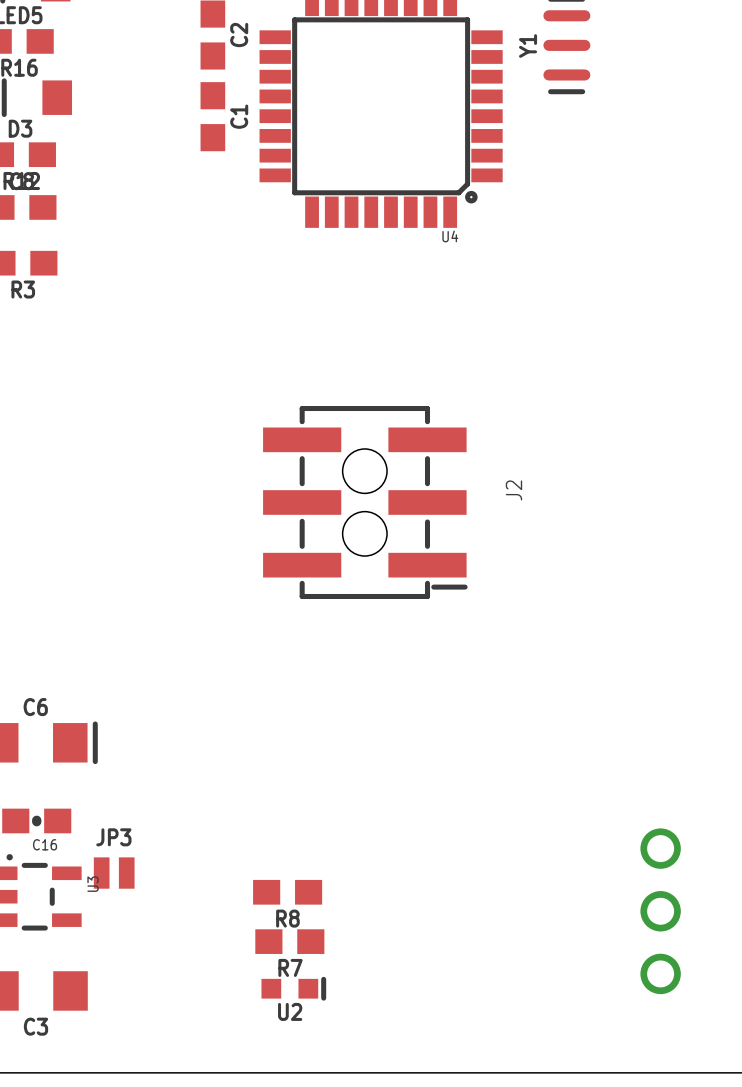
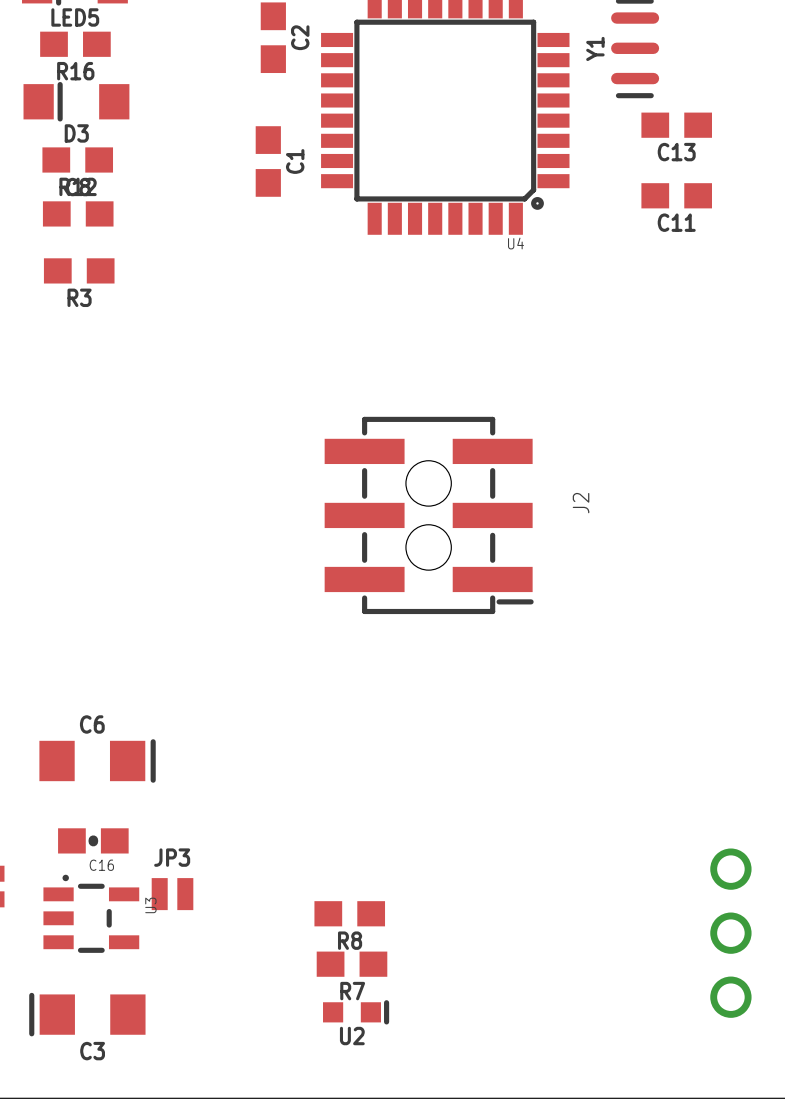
C1 position: (212, 116) -> (268, 161)
C13: none -> (676, 125)
C11: none -> (676, 195)

